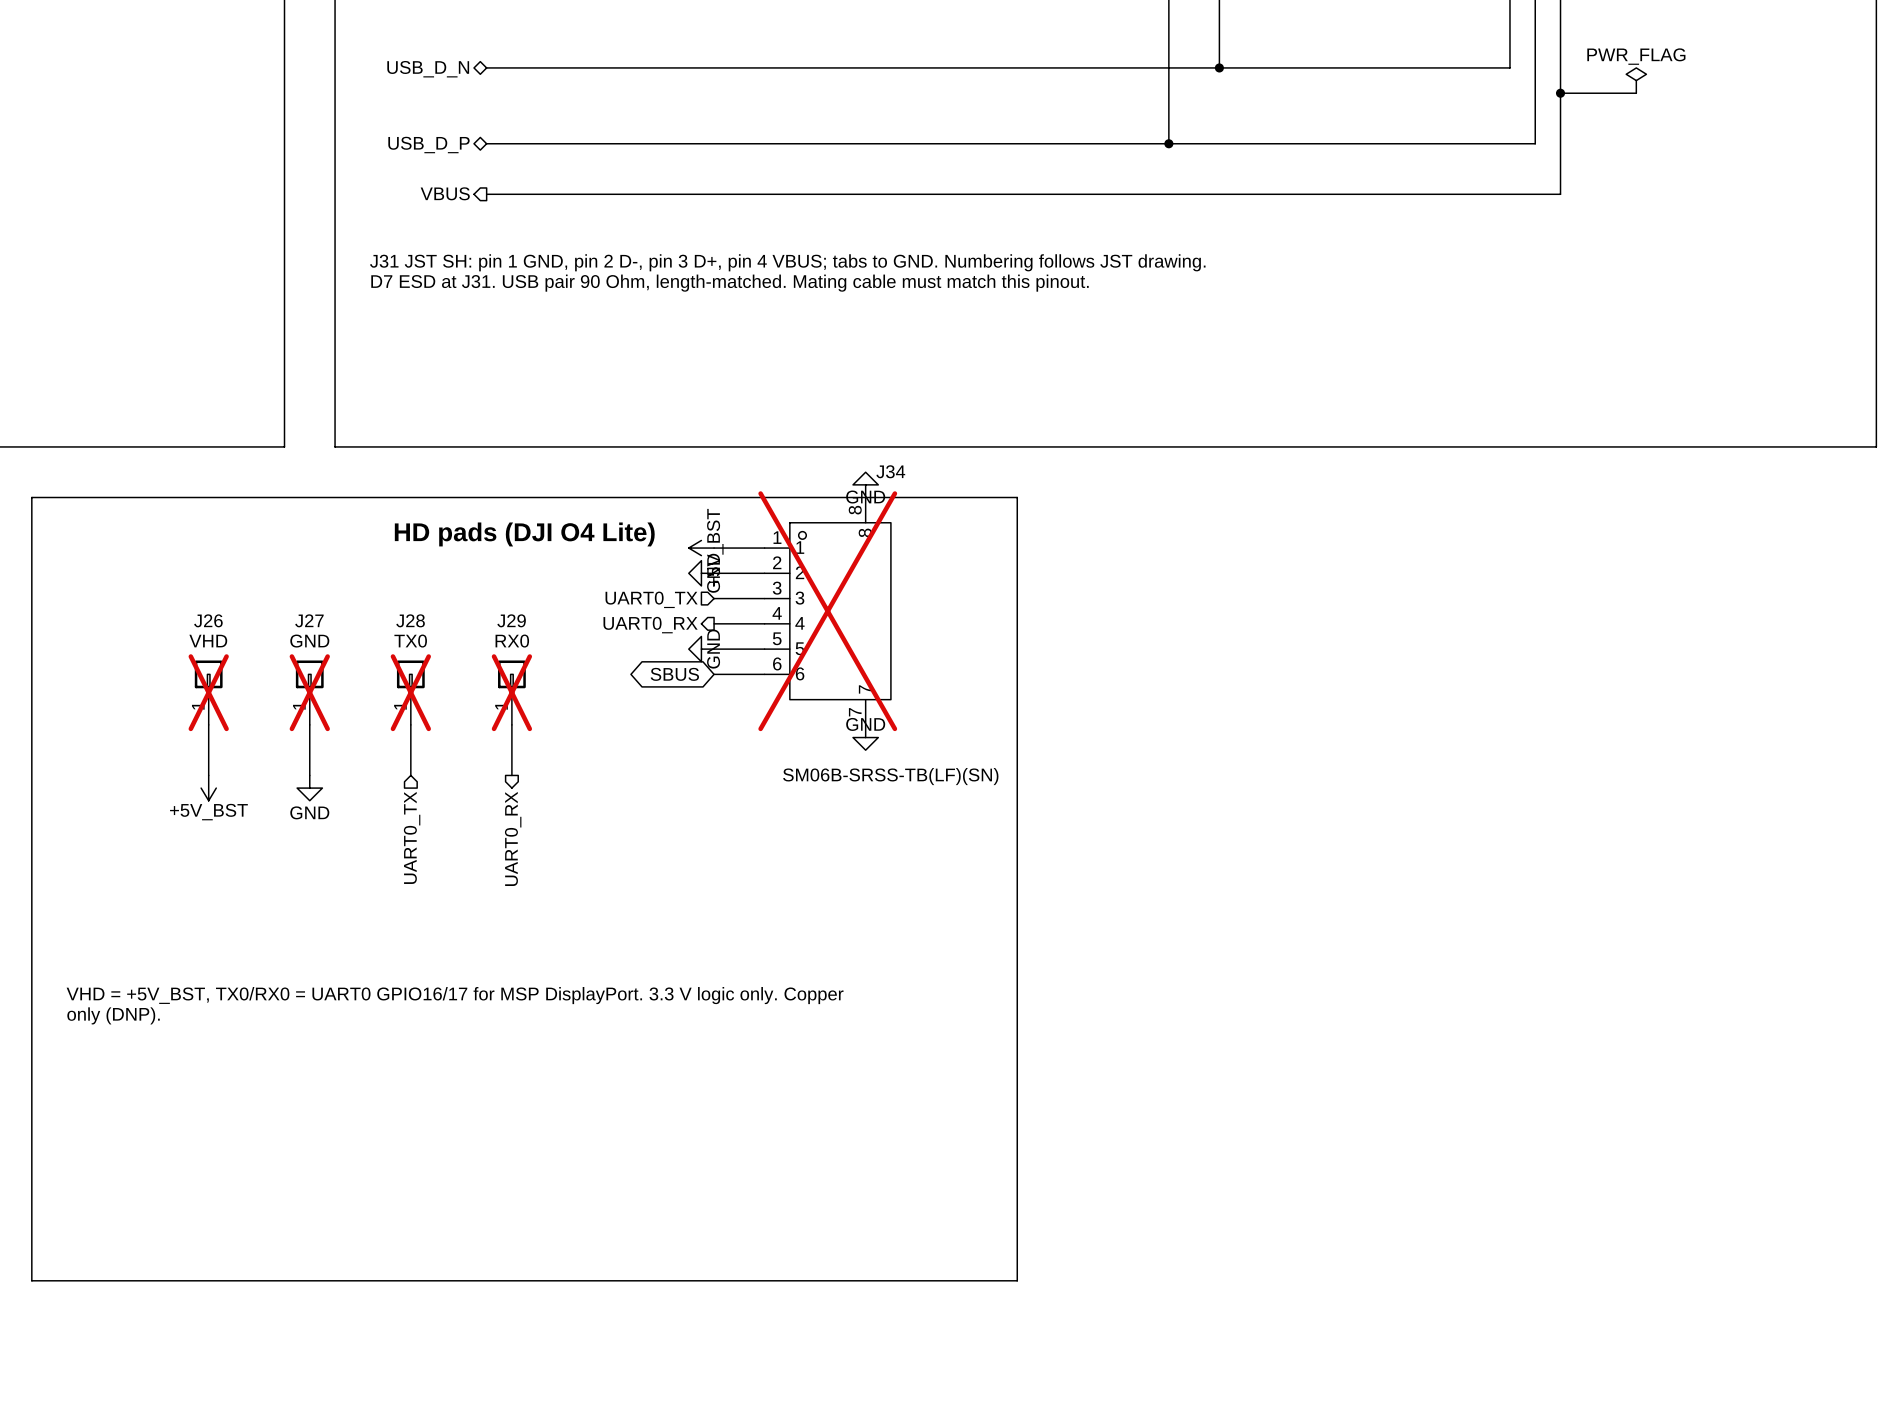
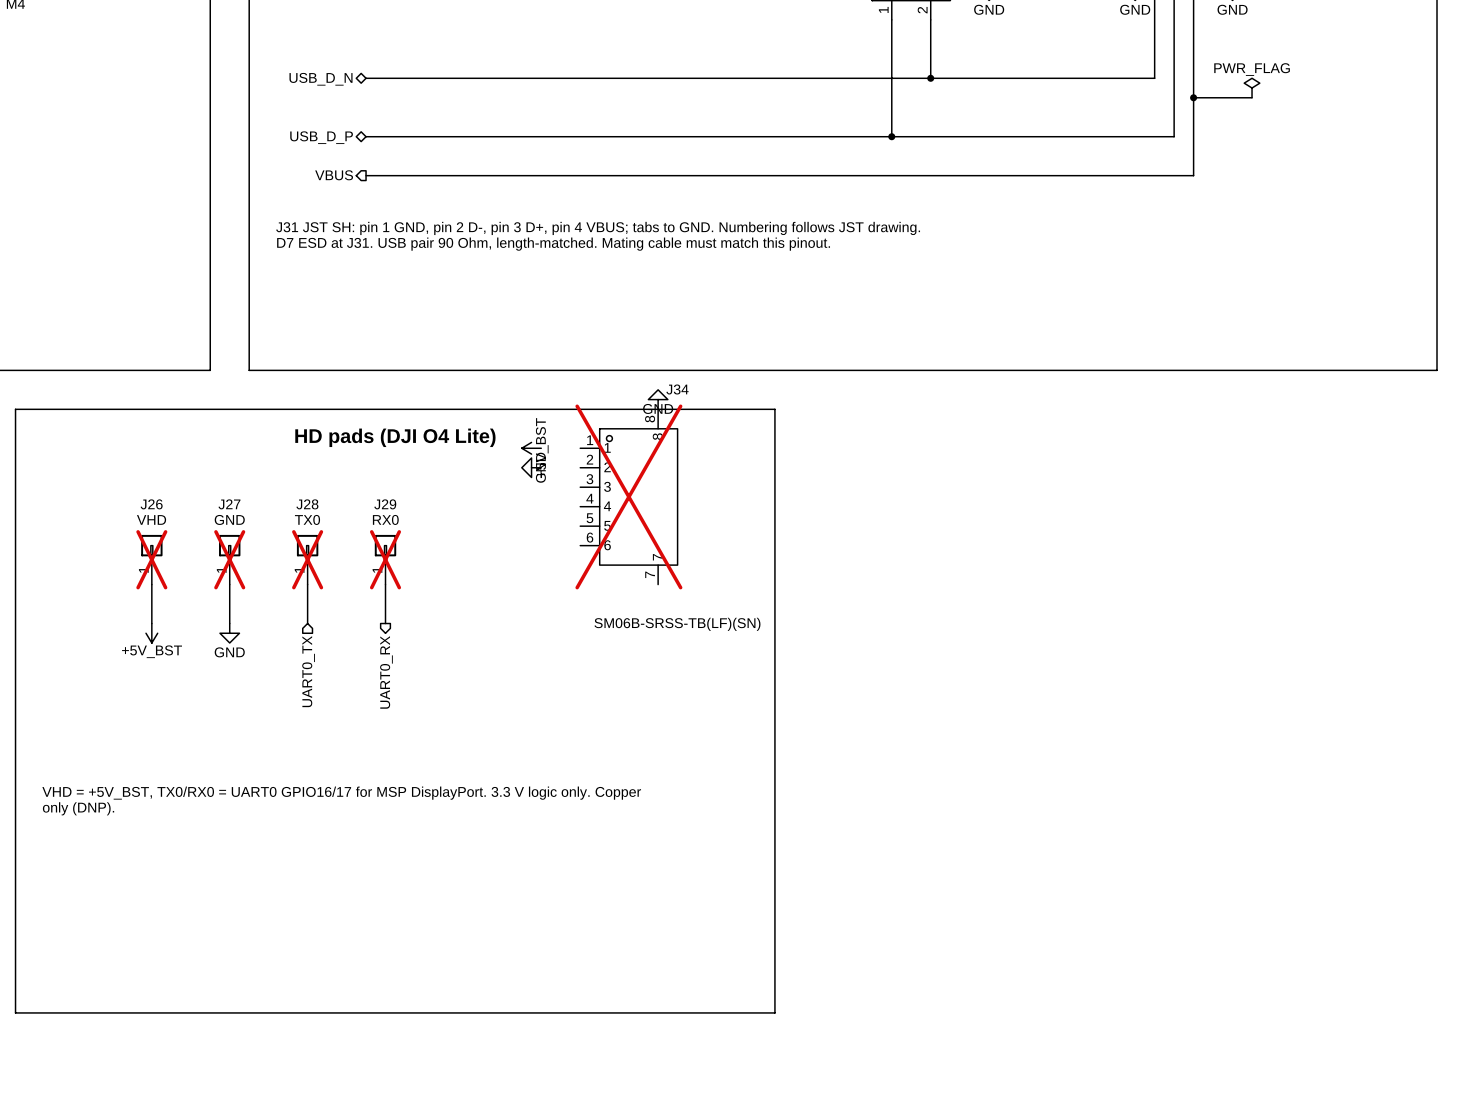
wire: (714, 548) (764, 548) -> none
wire: (714, 573) (764, 573) -> none
wire: (714, 598) (764, 598) -> none
hierarchical label: UART0_TX (651, 599) -> none
wire: (714, 623) (764, 623) -> none
hierarchical label: UART0_RX (650, 625) -> none
power symbol: GND (701, 649) -> none
wire: (714, 649) (764, 649) -> none
global label: SBUS (674, 674) -> none
wire: (714, 674) (764, 674) -> none
power symbol: GND (865, 737) -> none

